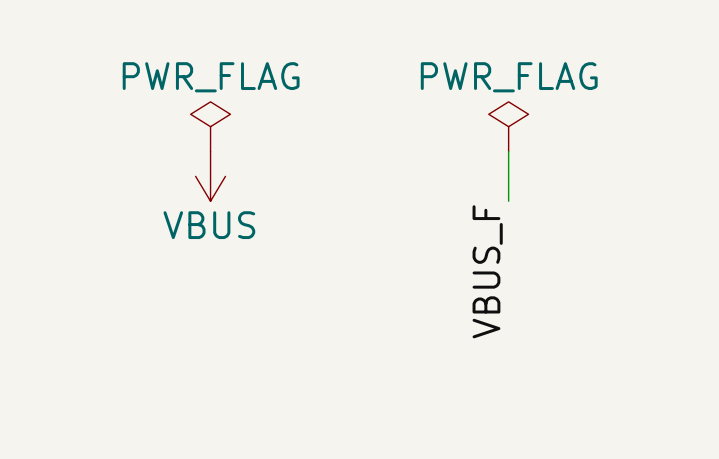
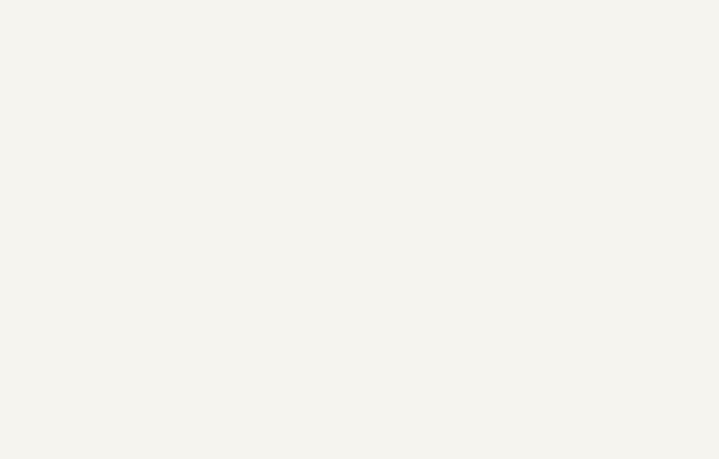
power symbol: PWR_FLAG (210, 126) -> none
power symbol: PWR_FLAG (508, 126) -> none
wire: (508, 151) (508, 201) -> none
power symbol: VBUS (210, 176) -> none
label: VBUS_F (487, 271) -> none

